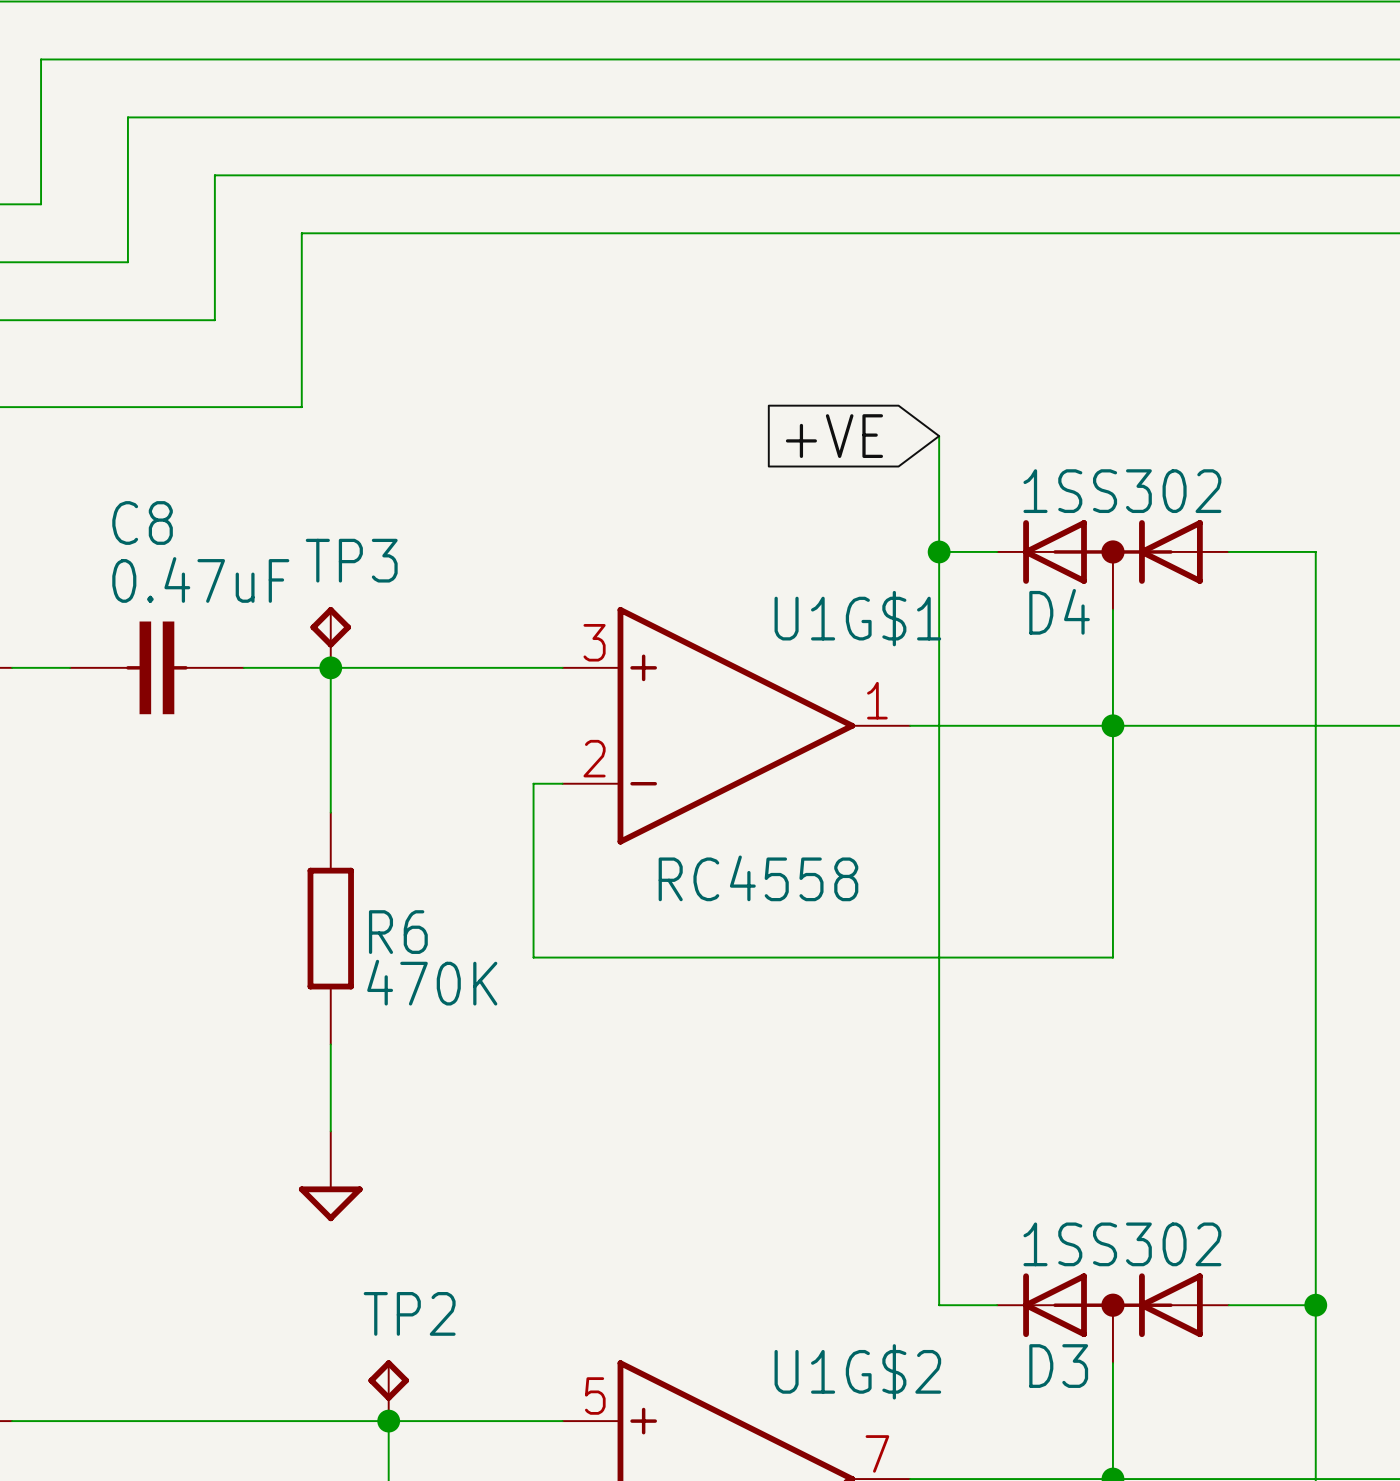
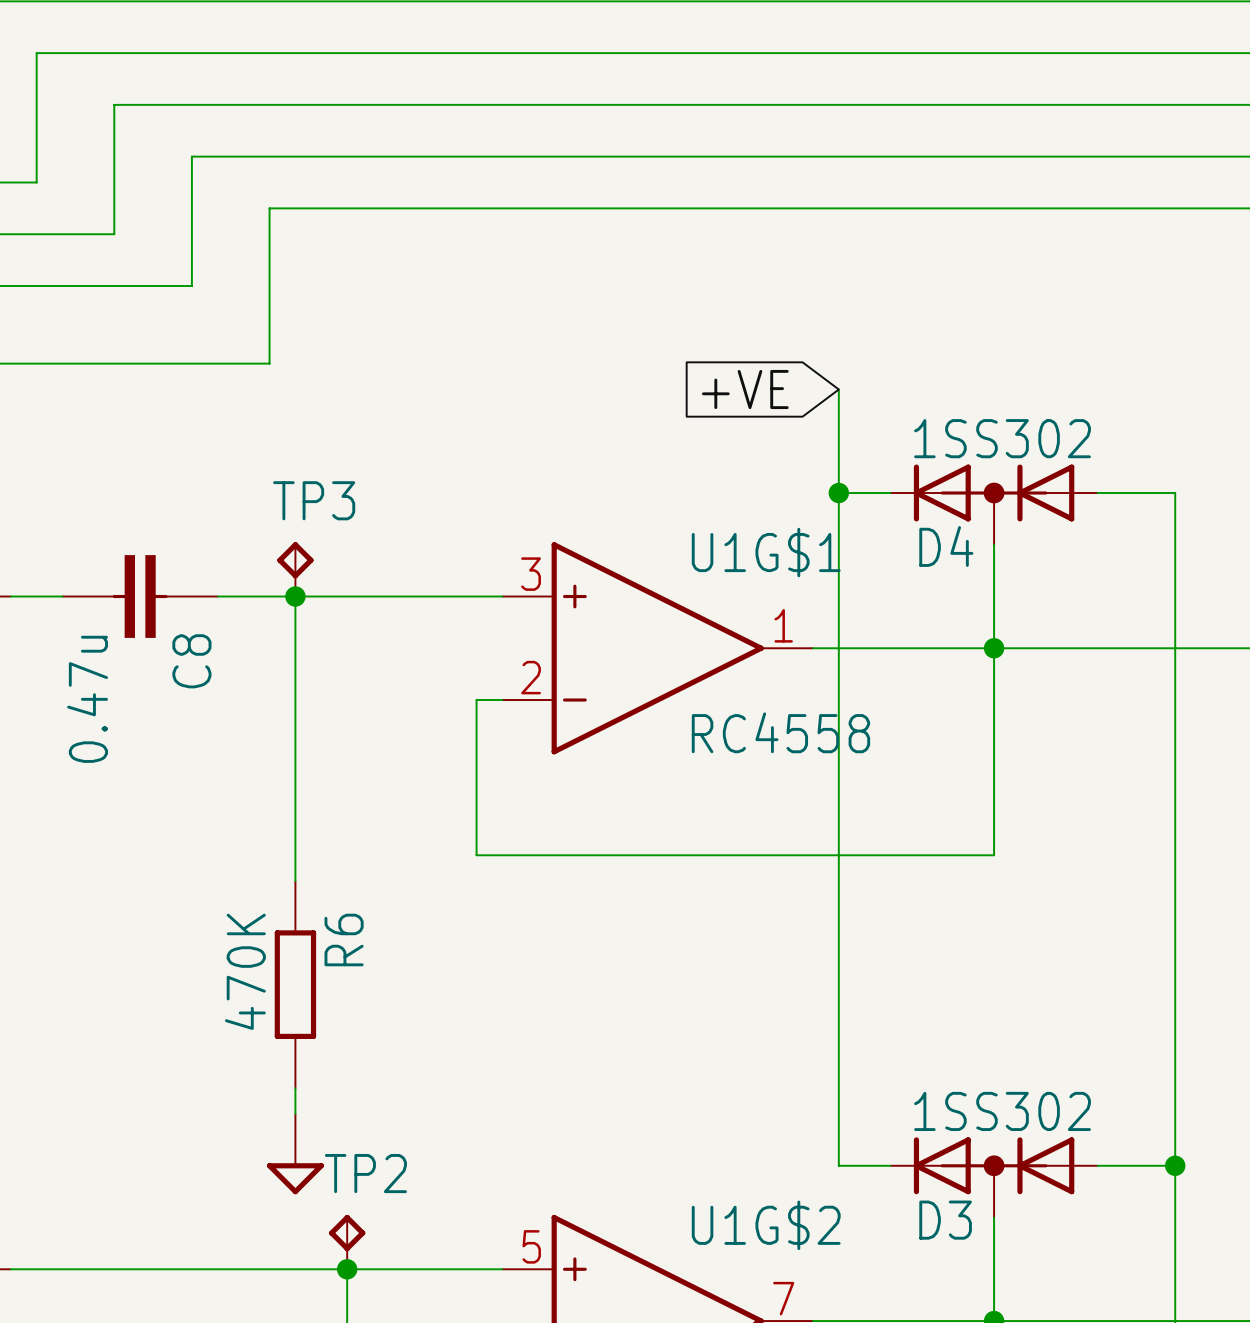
C8 name rotation: 0° (142, 523) -> 90° counterclockwise (191, 661)
C8 name position: C8 (142, 523) -> C8 (191, 661)
C8 value: 0.47uF (200, 579) -> 0.47u (87, 699)
wire: none -> (295, 725) (295, 881)
U1G$1 value position: RC4558 (758, 878) -> RC4558 (780, 732)
R6 position: (330, 928) -> (295, 984)
R6 name rotation: 0° (398, 932) -> 90° counterclockwise (344, 939)
R6 value rotation: 0° (432, 982) -> 90° counterclockwise (245, 971)
R6 value position: 470K (432, 982) -> 470K (245, 971)
wire: (330, 1044) (330, 1131) -> none
power symbol position: (330, 1176) -> (295, 1154)
wire: none -> (295, 1088) (295, 1114)

